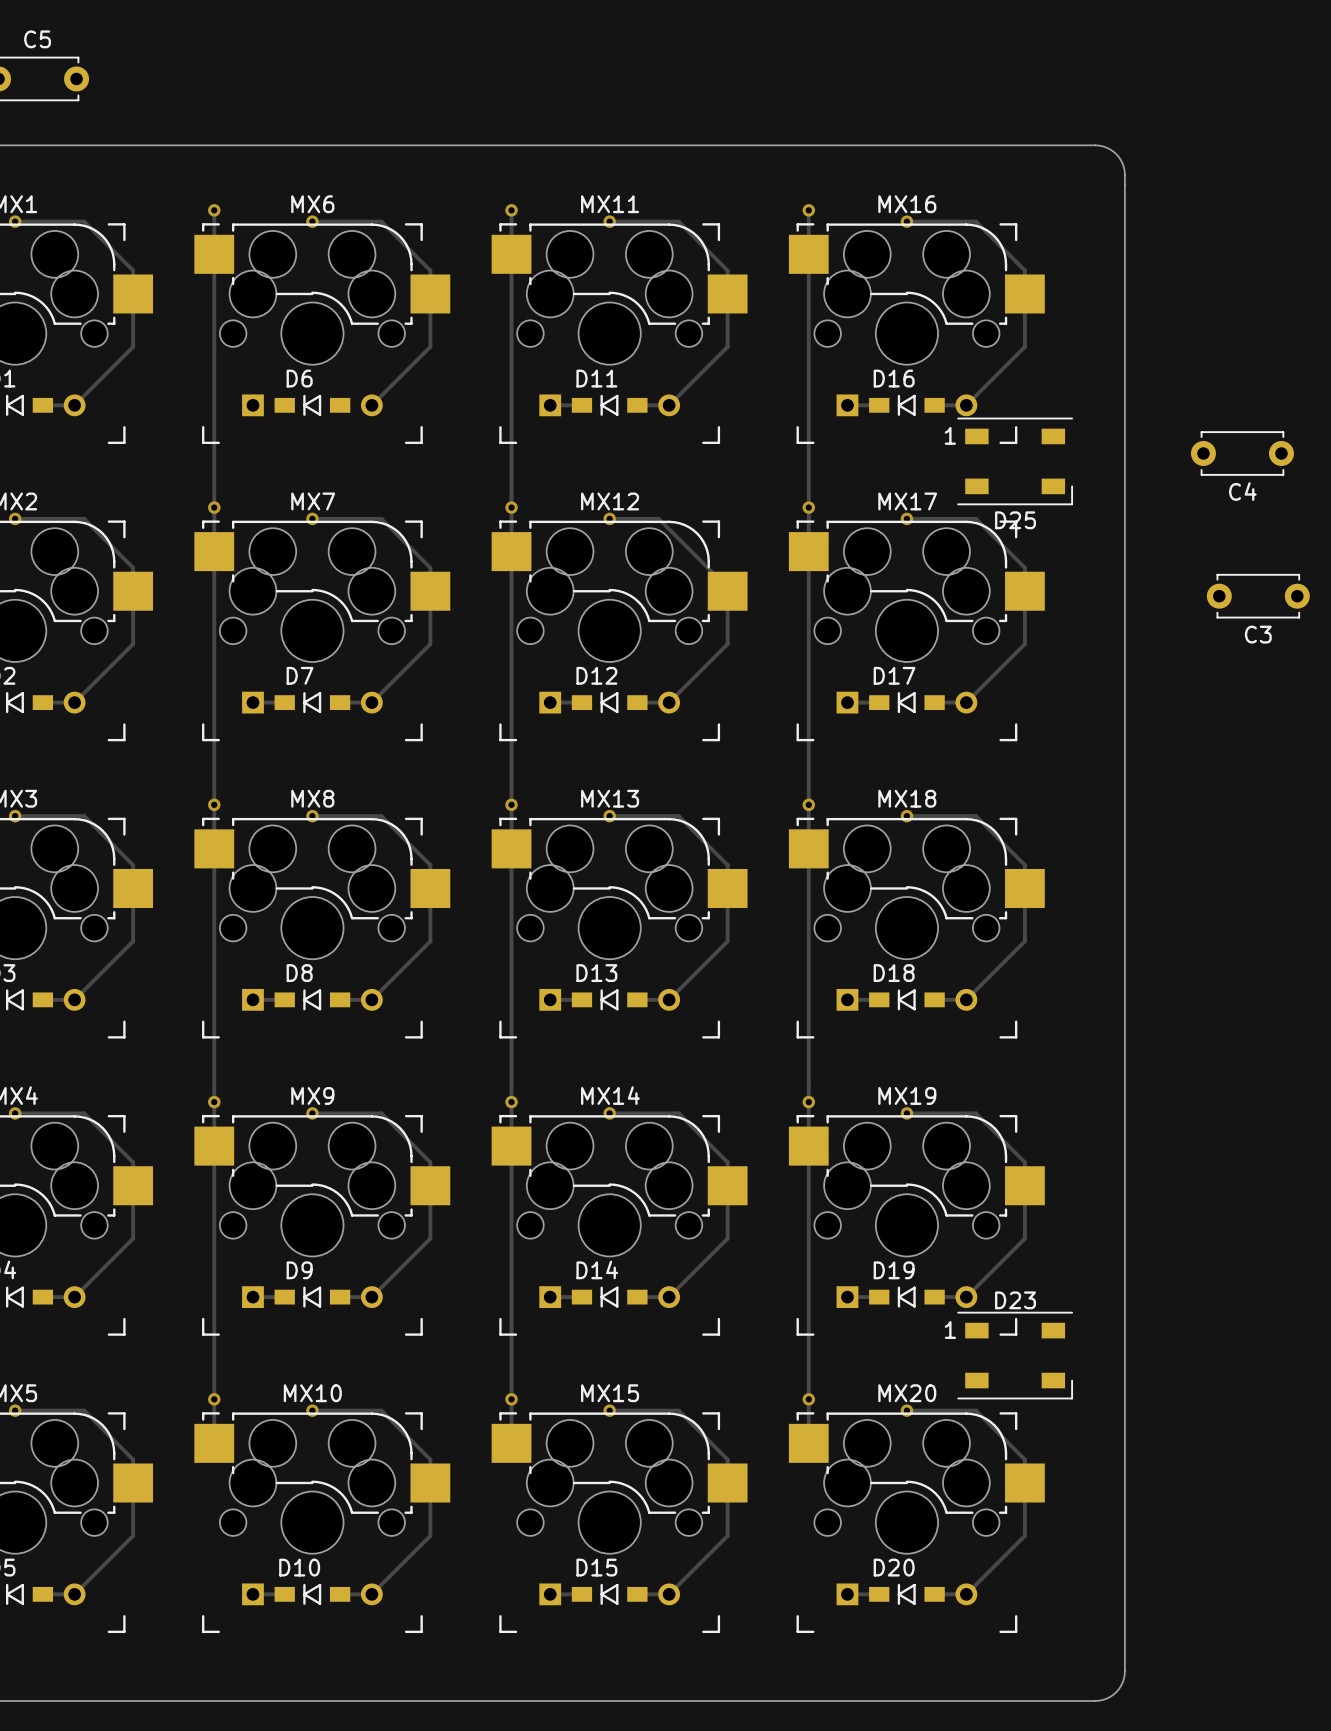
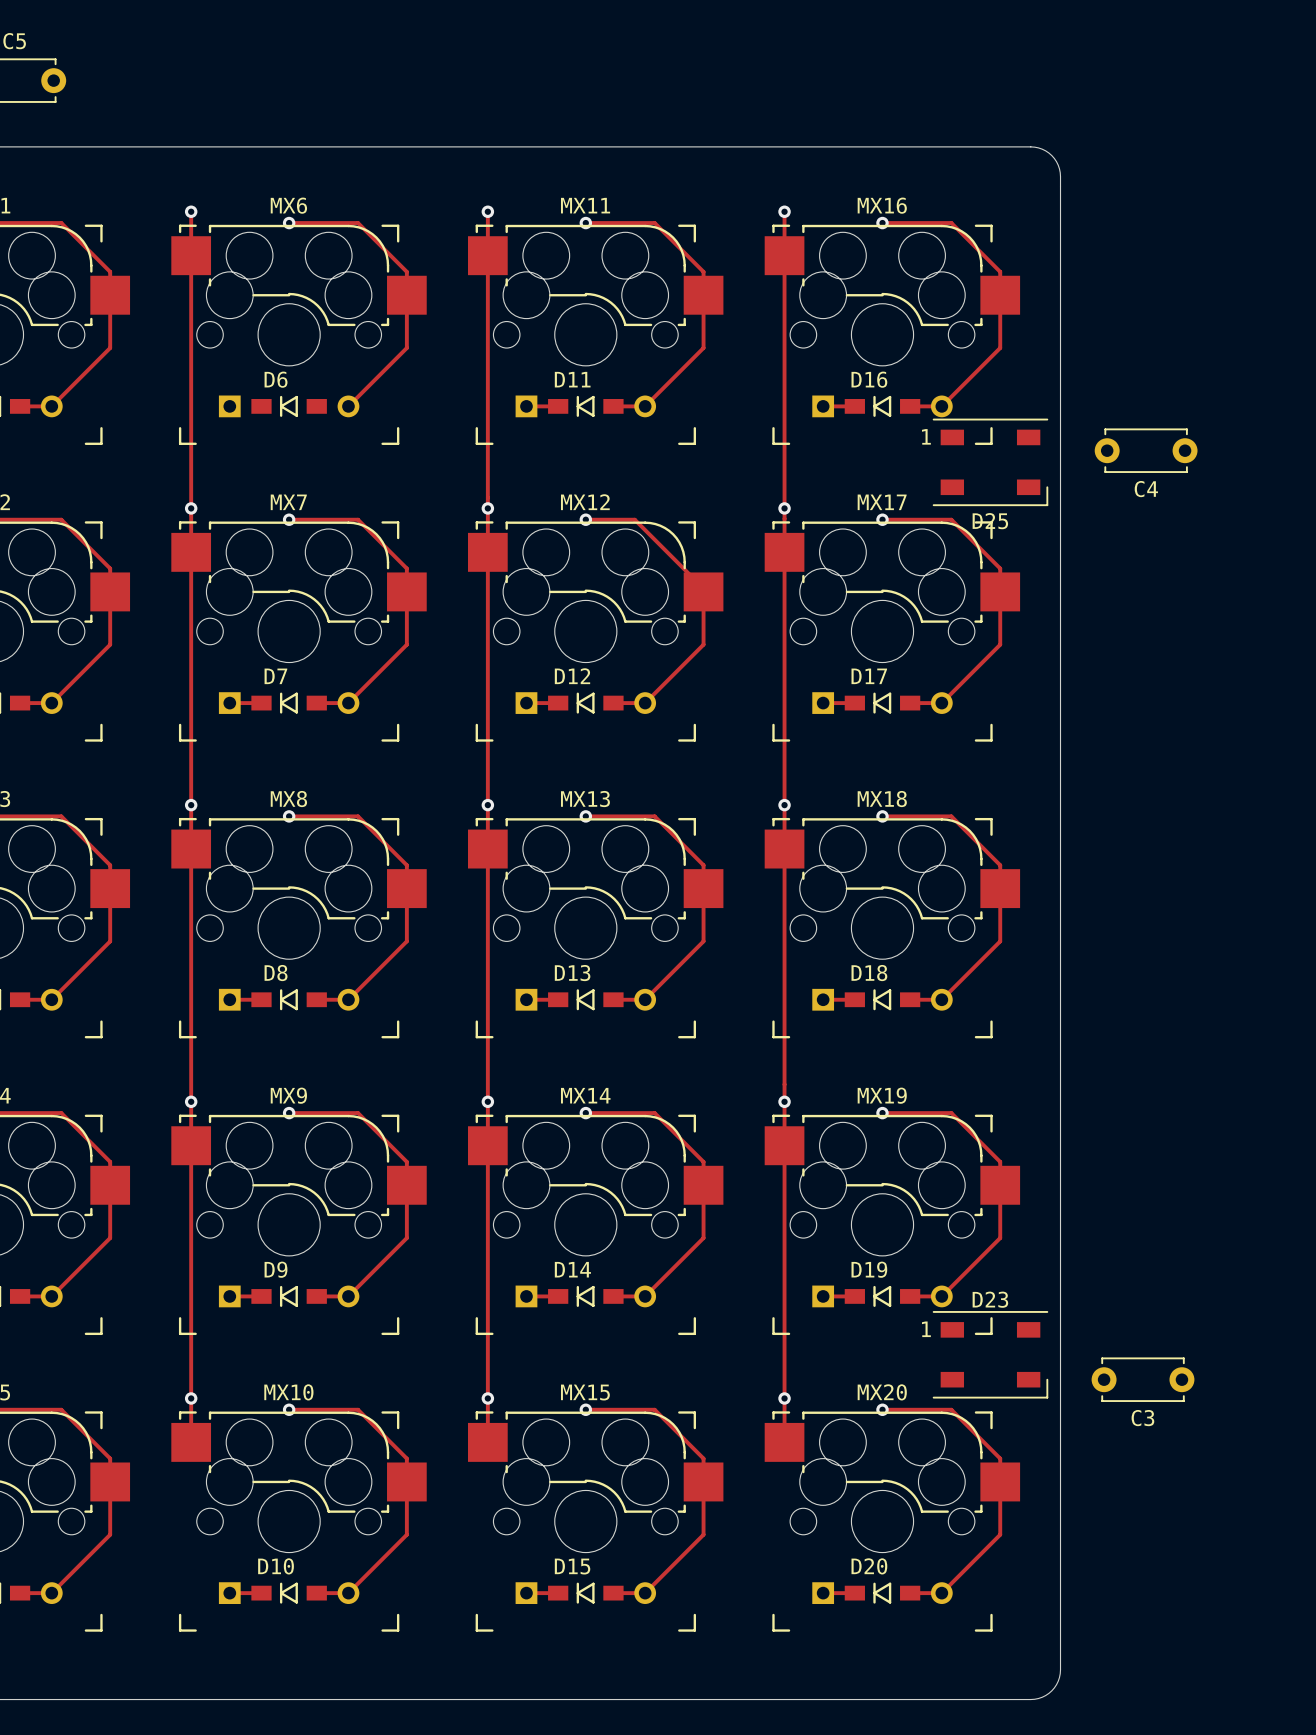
board edge: (1055, 145) (1095, 145) (1106, 147) (1113, 151) (1120, 160) (1124, 175) (1124, 1671) (1120, 1686) (1113, 1694) (1106, 1698) (1095, 1700) (1055, 1700) -> (1030, 146) (1042, 149) (1051, 155) (1058, 165) (1060, 176) (1060, 1669) (1058, 1681) (1051, 1690) (1042, 1697) (1030, 1699)
C4 position: (1242, 453) -> (1146, 450)
C3 position: (1258, 596) -> (1143, 1379)

